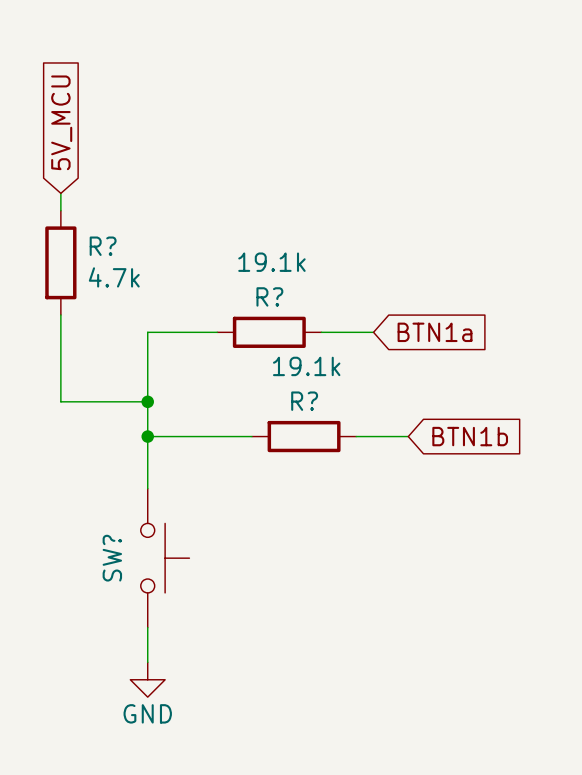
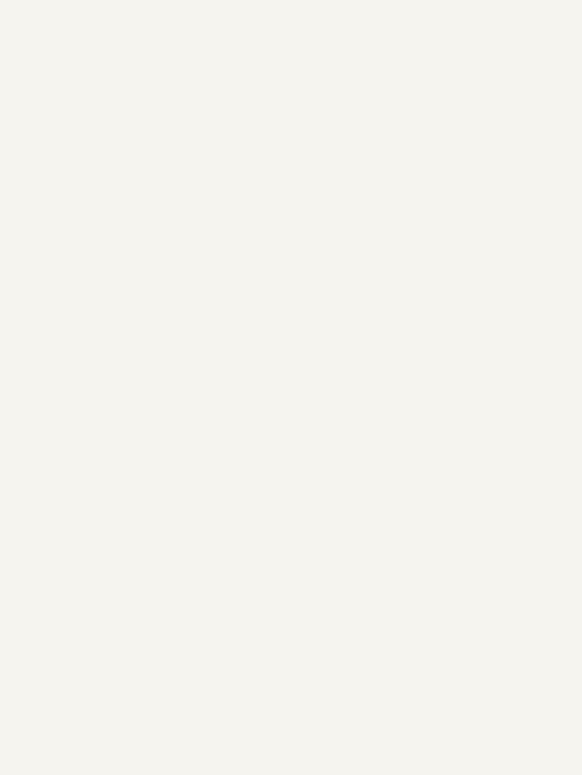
global label: 5V_MCU (61, 122) -> none
wire: (60, 193) (60, 210) -> none
R?: 4.7k (60, 262) -> none
wire: (60, 314) (60, 401) (147, 401) -> none
wire: (217, 332) (147, 332) (147, 488) -> none
R?: 19.1k (269, 332) -> none
wire: (321, 332) (373, 332) -> none
global label: BTN1a (435, 332) -> none
junction: (147, 401) -> none
wire: (147, 436) (251, 436) -> none
junction: (147, 436) -> none
R?: 19.1k (304, 436) -> none
wire: (356, 436) (408, 436) -> none
global label: BTN1b (470, 436) -> none
SW?: (165, 558) -> none
wire: (147, 627) (147, 662) -> none
power symbol: GND (147, 679) -> none

